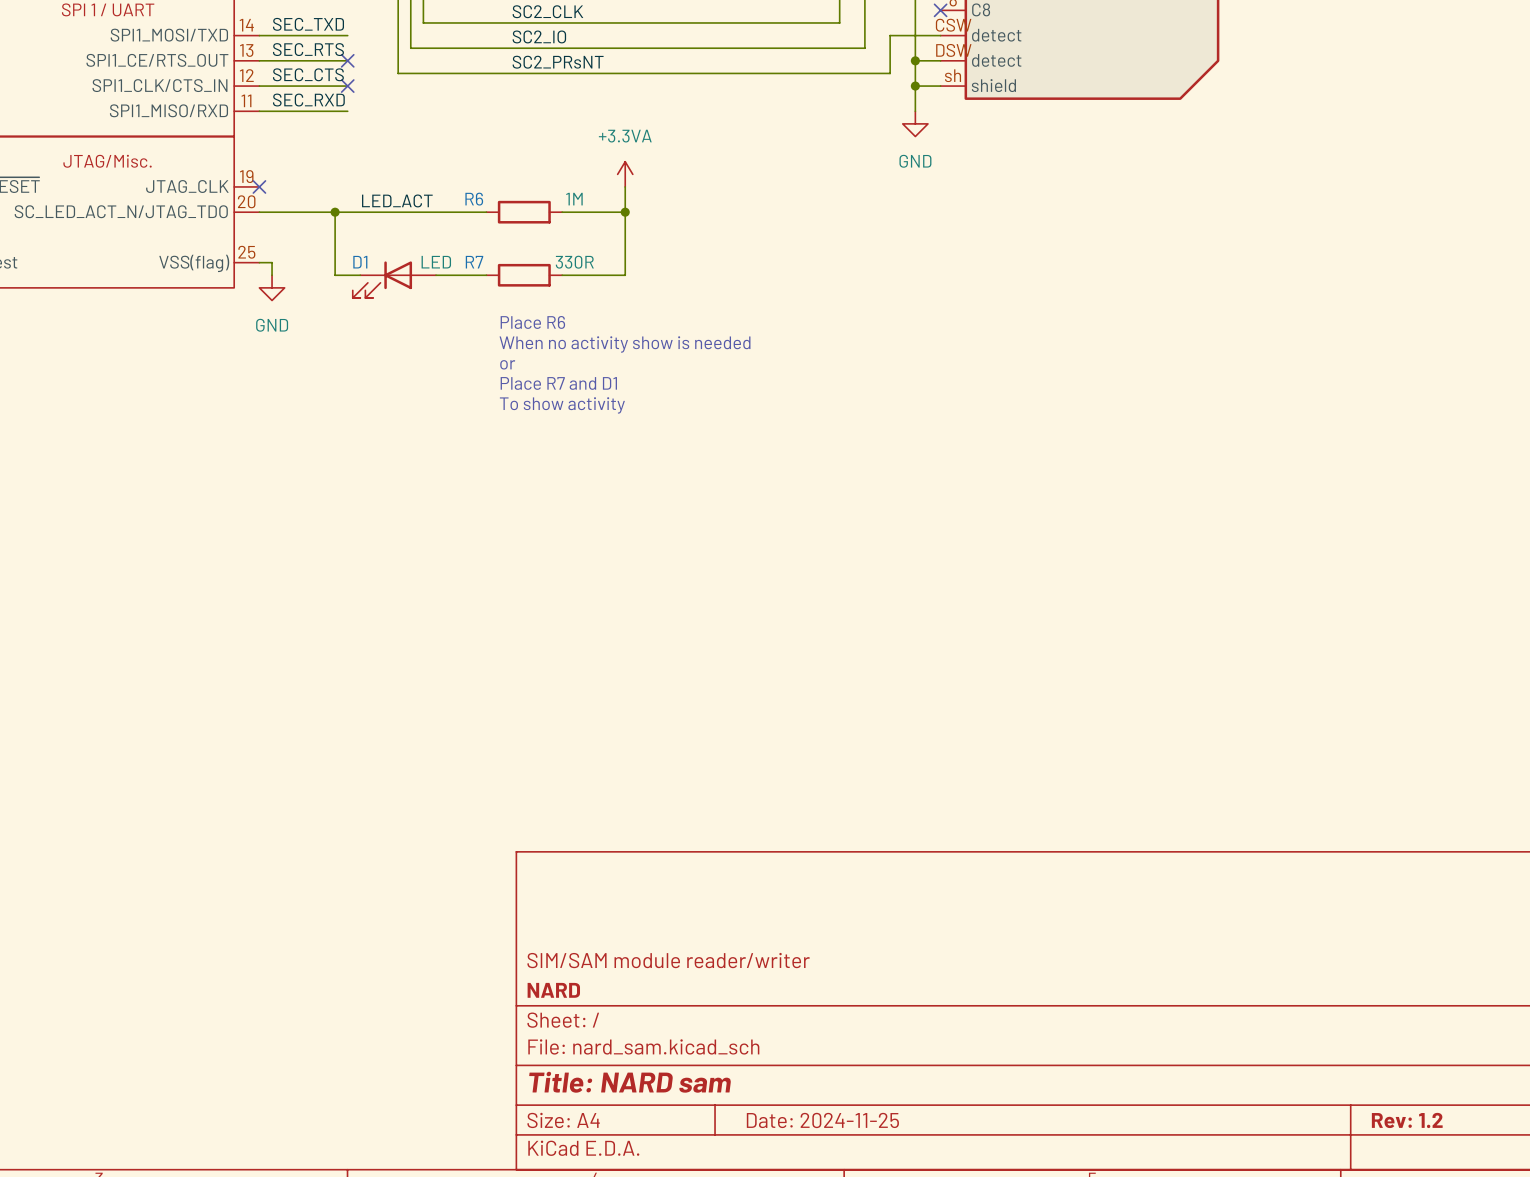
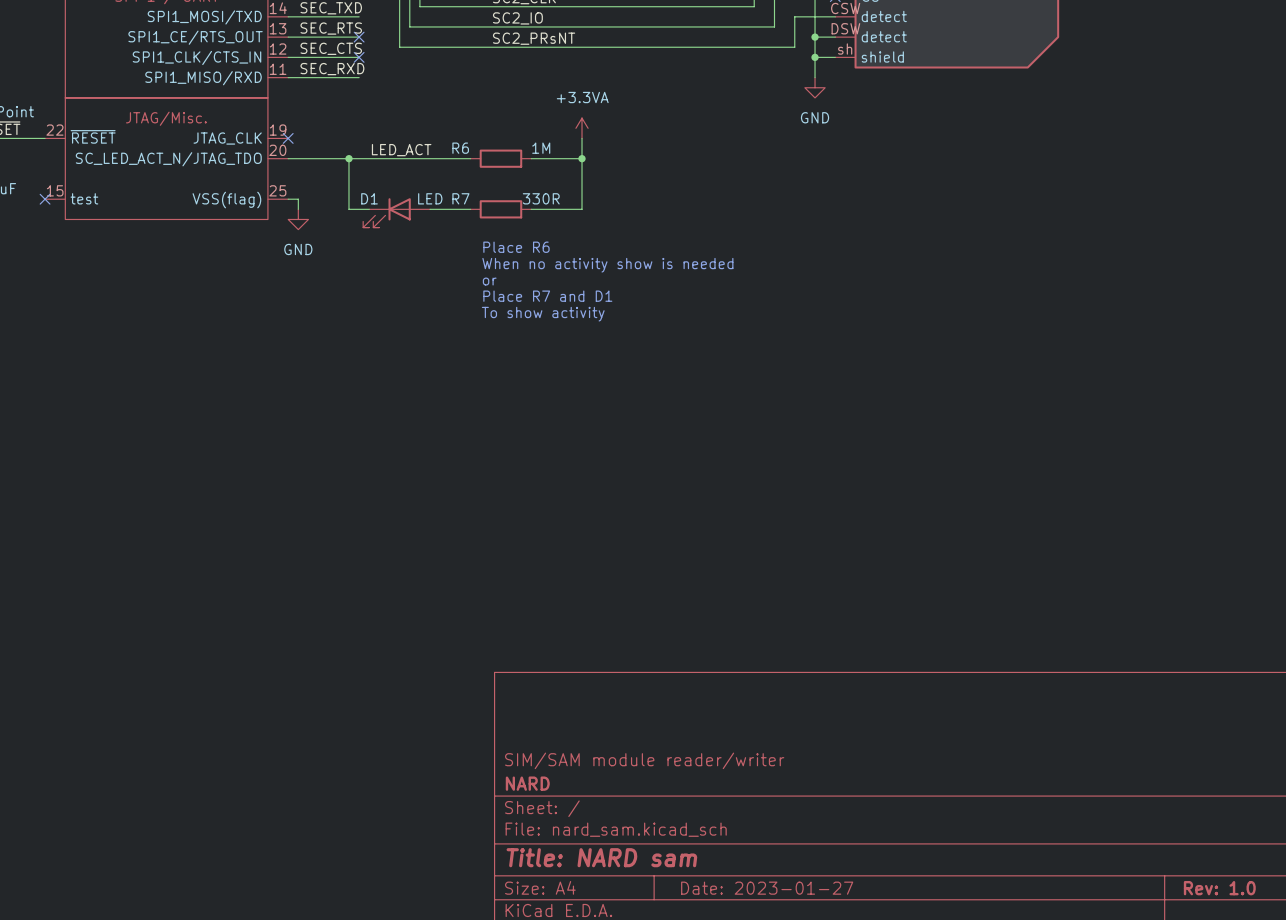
title block: Date: 2024-11-25 (822, 1120) -> Date: 2023-01-27 (767, 888)
title block: Rev: 1.2 (1407, 1120) -> Rev: 1.0 (1219, 888)

